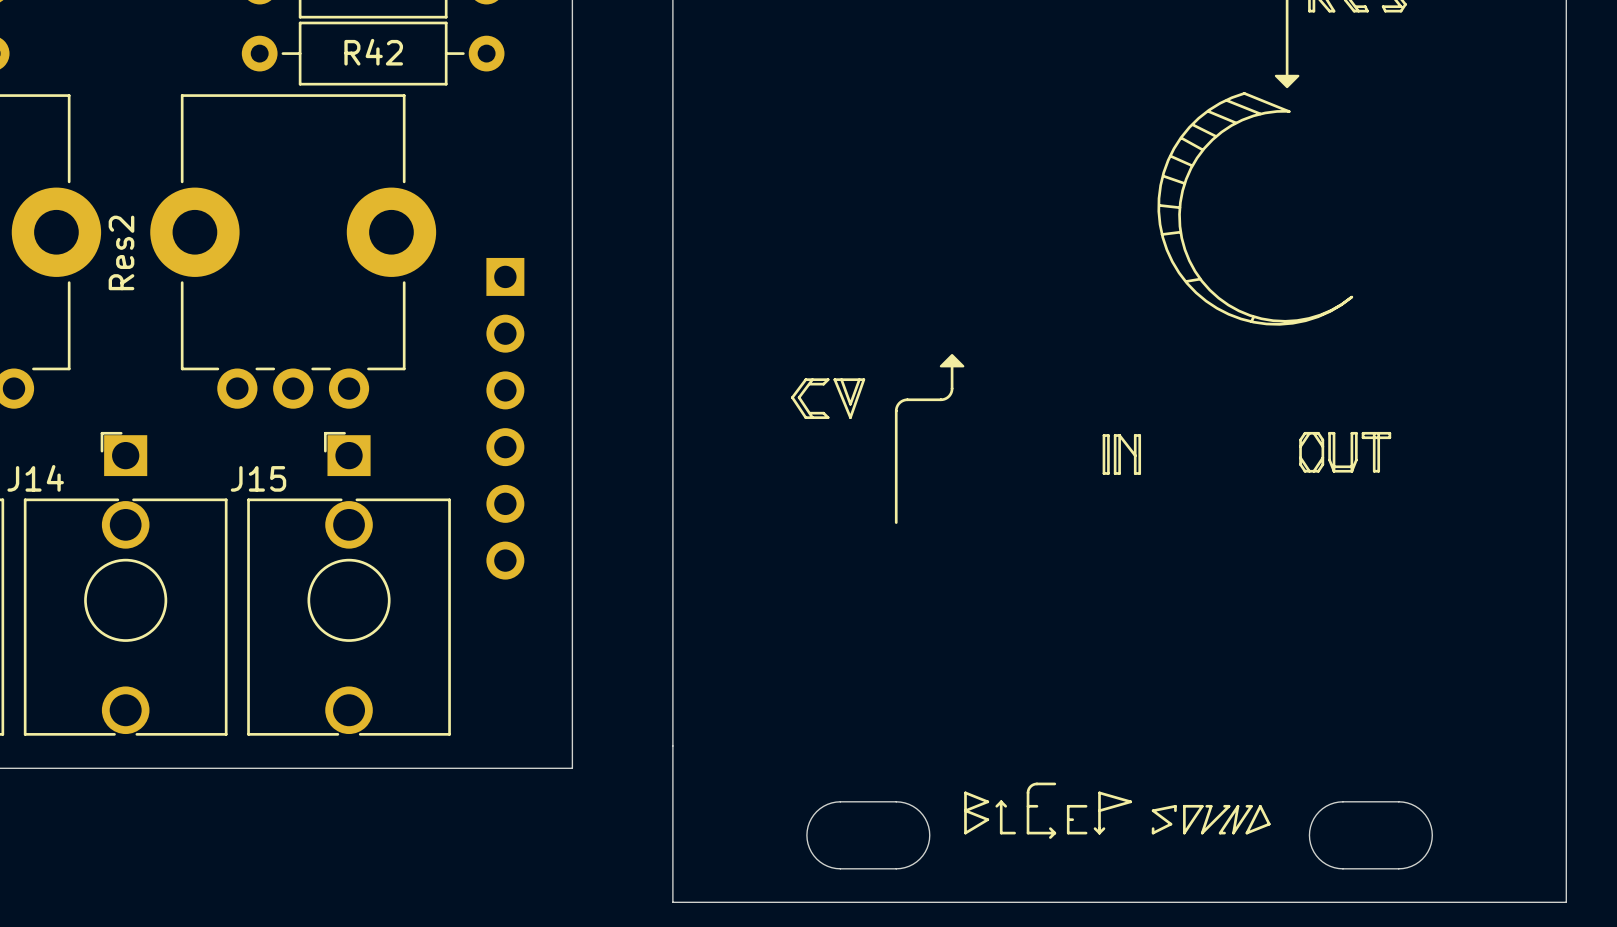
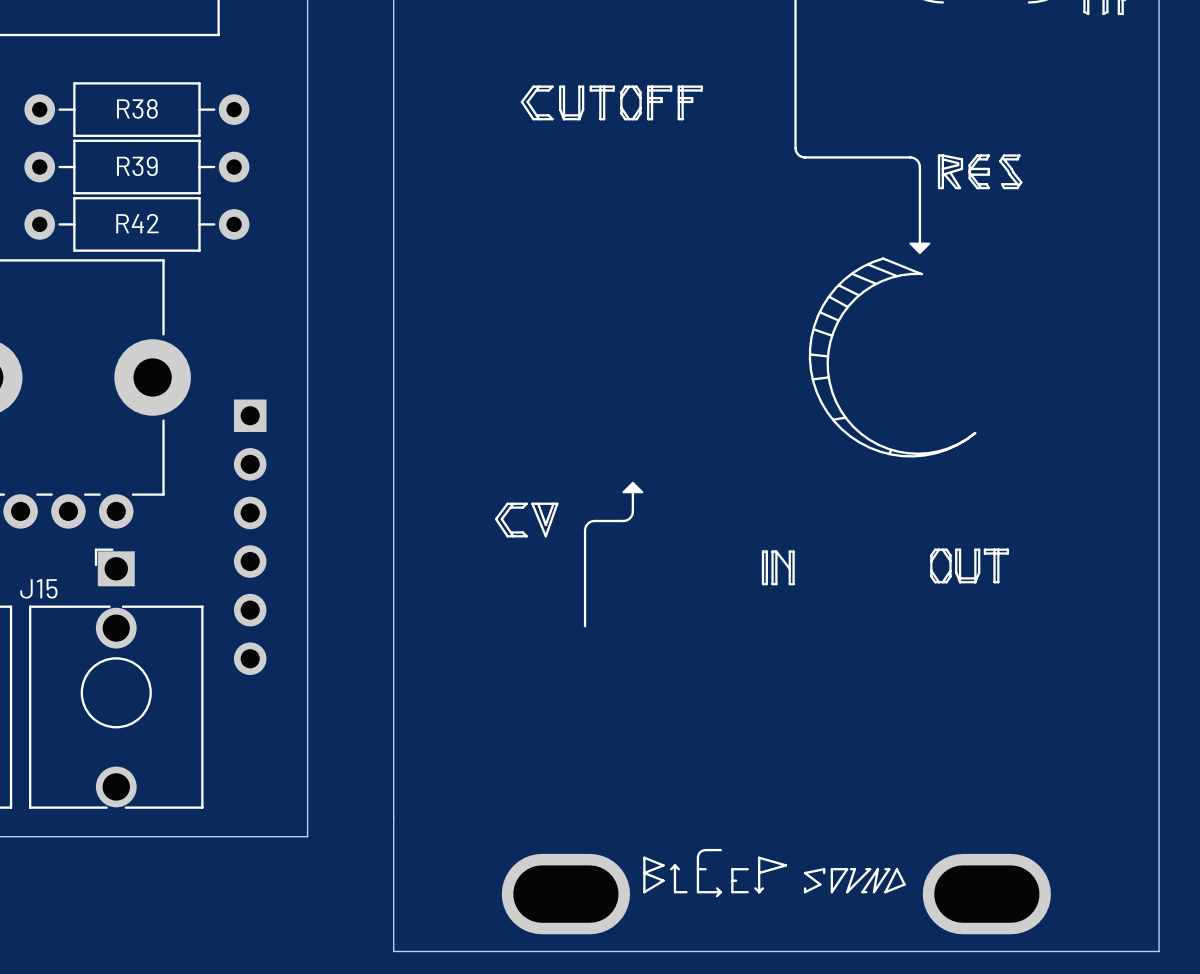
board edge: (840, 801) (896, 801) (913, 806) (922, 814) (928, 826) (929, 839) (925, 852) (916, 861) (900, 868) (840, 868) (823, 864) (813, 855) (809, 848) (807, 839) (808, 826) (813, 814) (820, 808) (831, 802) (840, 801) -> none
board edge: (1342, 801) (1398, 801) (1415, 806) (1425, 814) (1431, 826) (1432, 839) (1427, 852) (1419, 861) (1403, 868) (1342, 868) (1326, 864) (1319, 859) (1312, 848) (1309, 839) (1310, 826) (1316, 814) (1322, 808) (1334, 802) (1342, 801) -> none
part: none -> (565, 894)
part: none -> (986, 894)

